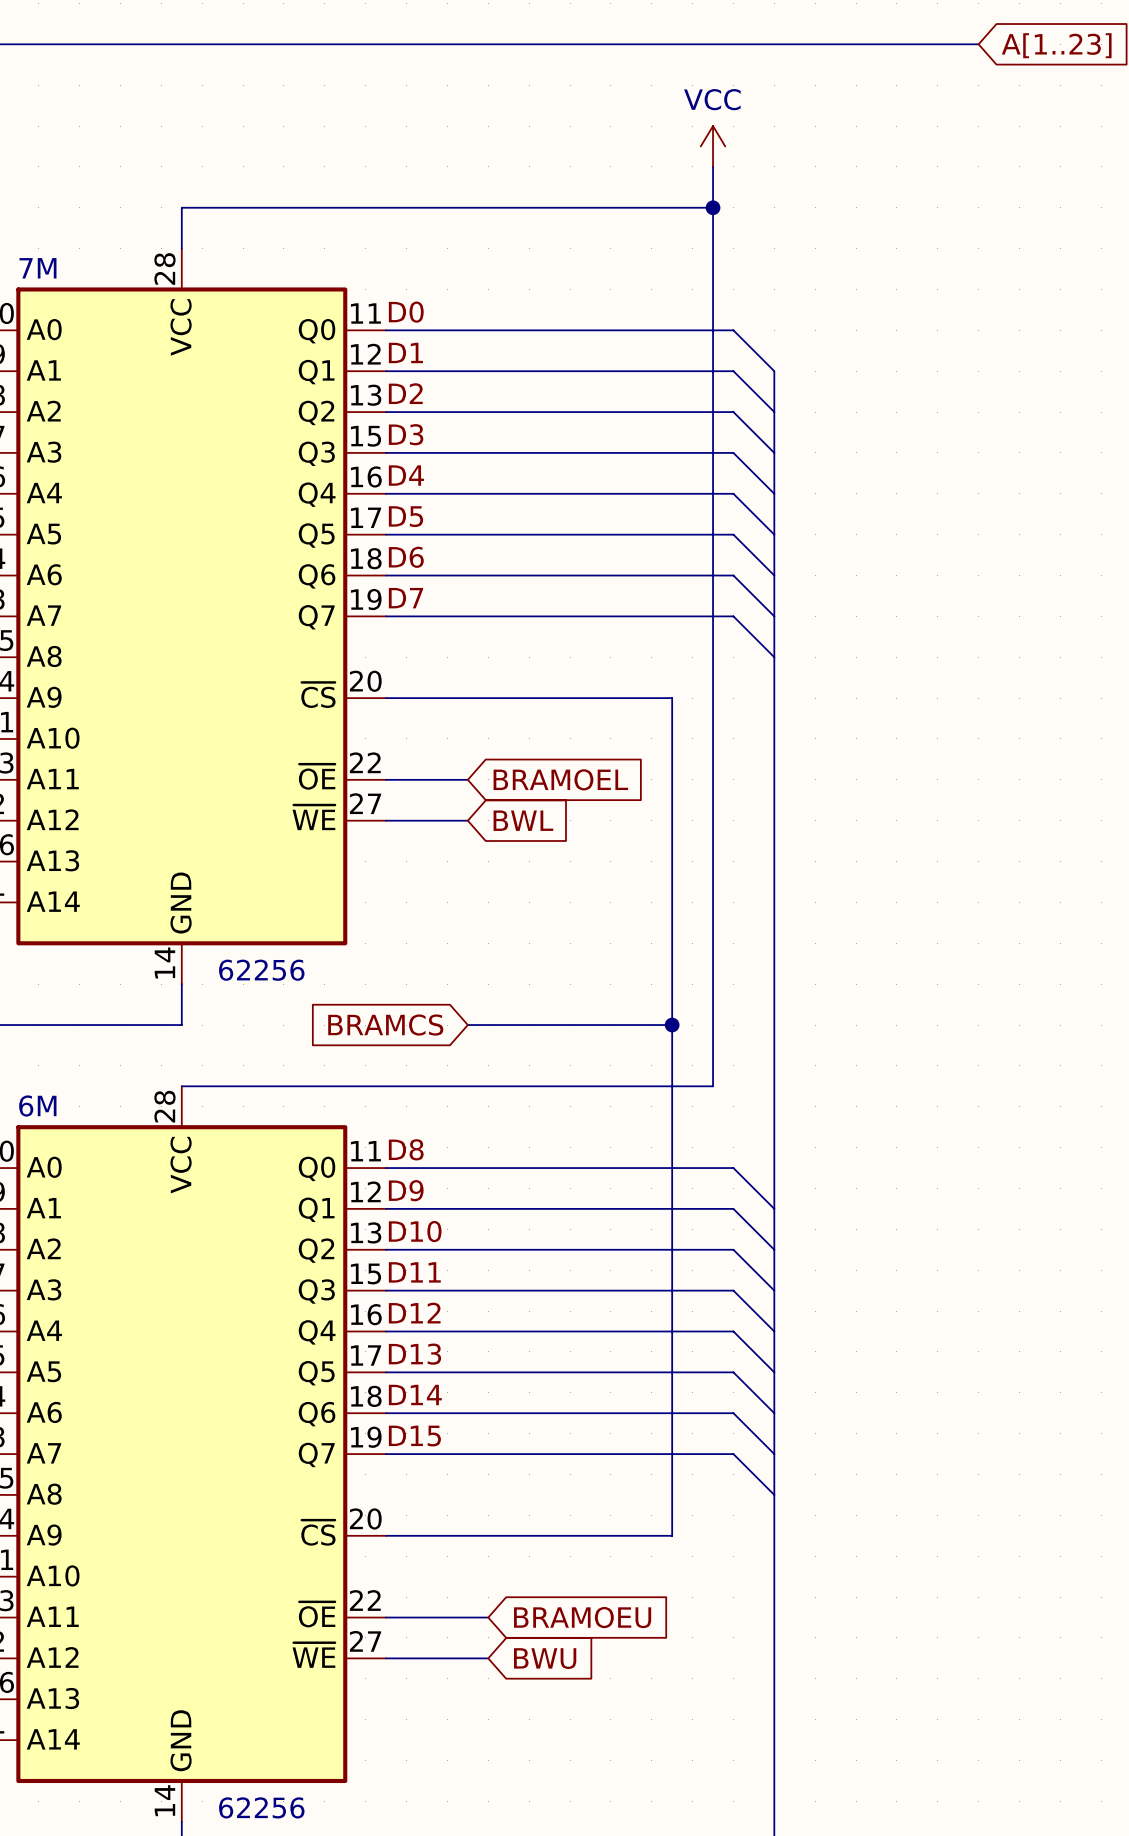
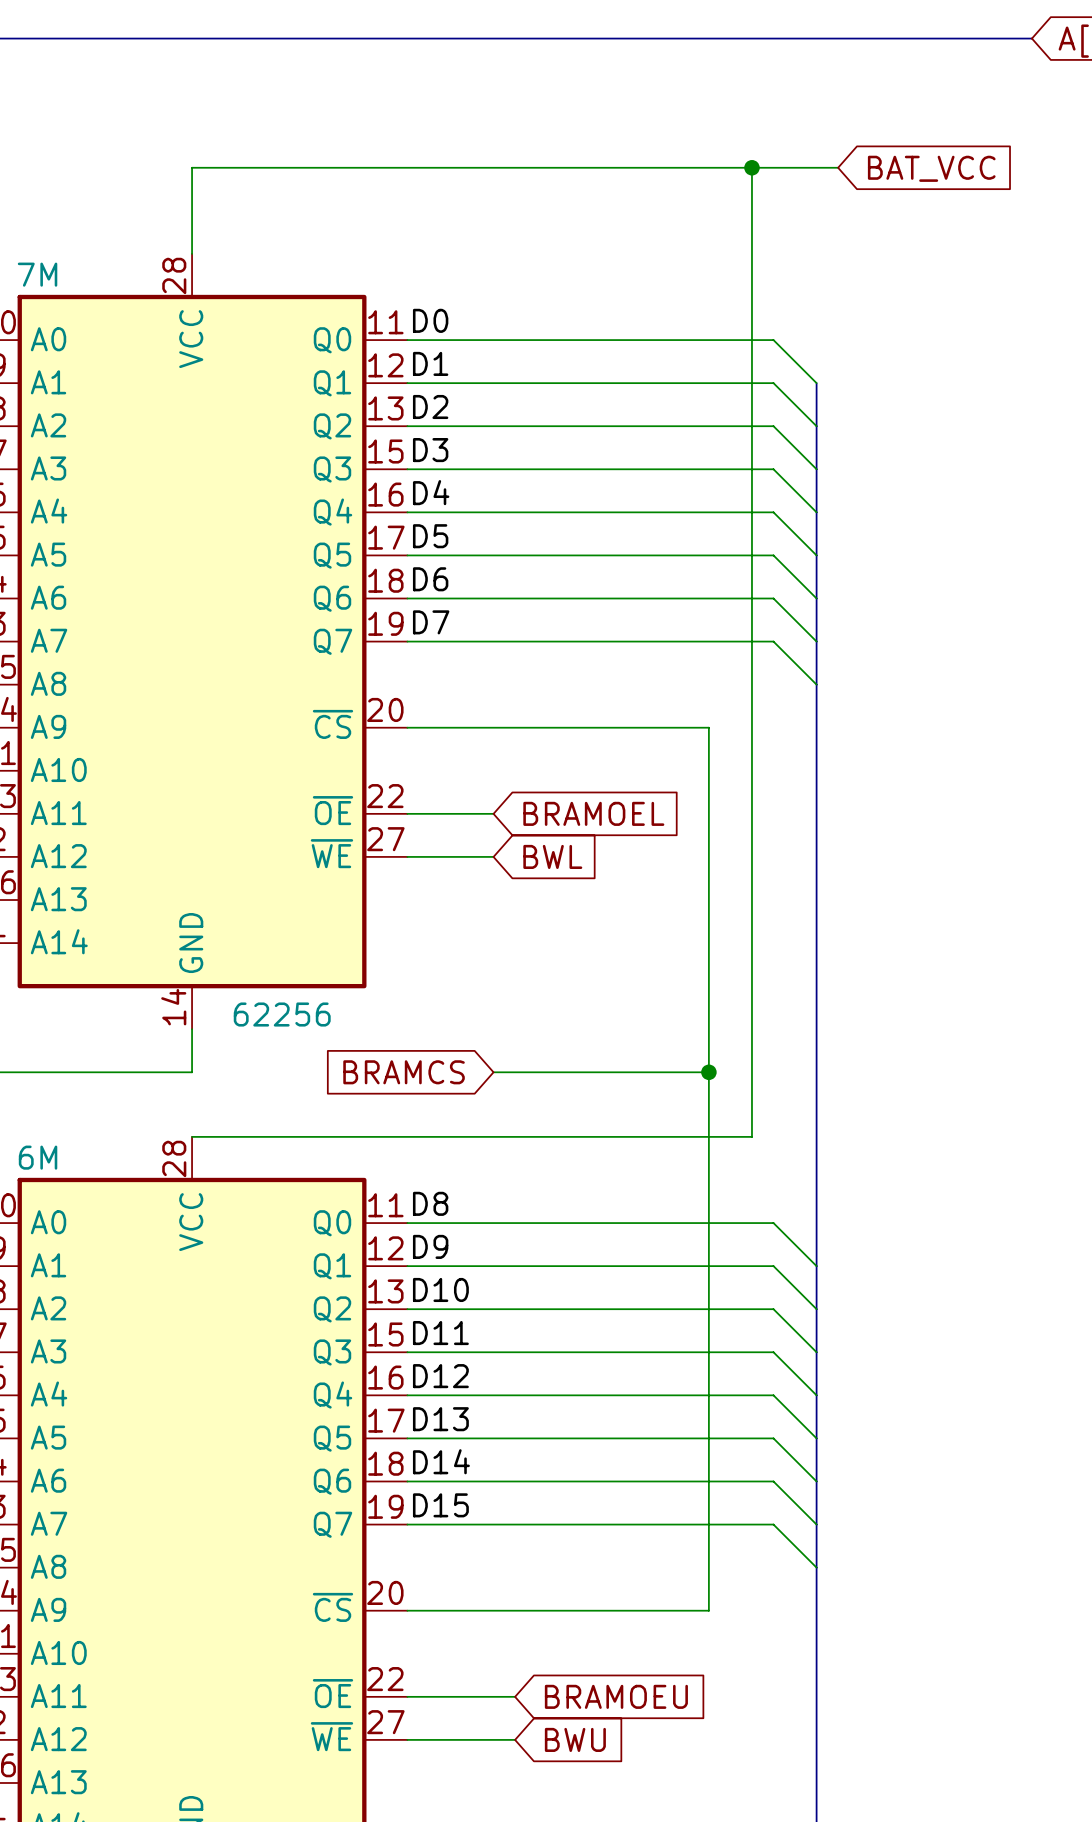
power symbol: VCC (713, 146) -> none
global label: none -> BAT_VCC (931, 168)
wire: (181, 207) (713, 207) -> (192, 210) (192, 167) (838, 167)
junction position: (713, 207) -> (751, 167)

